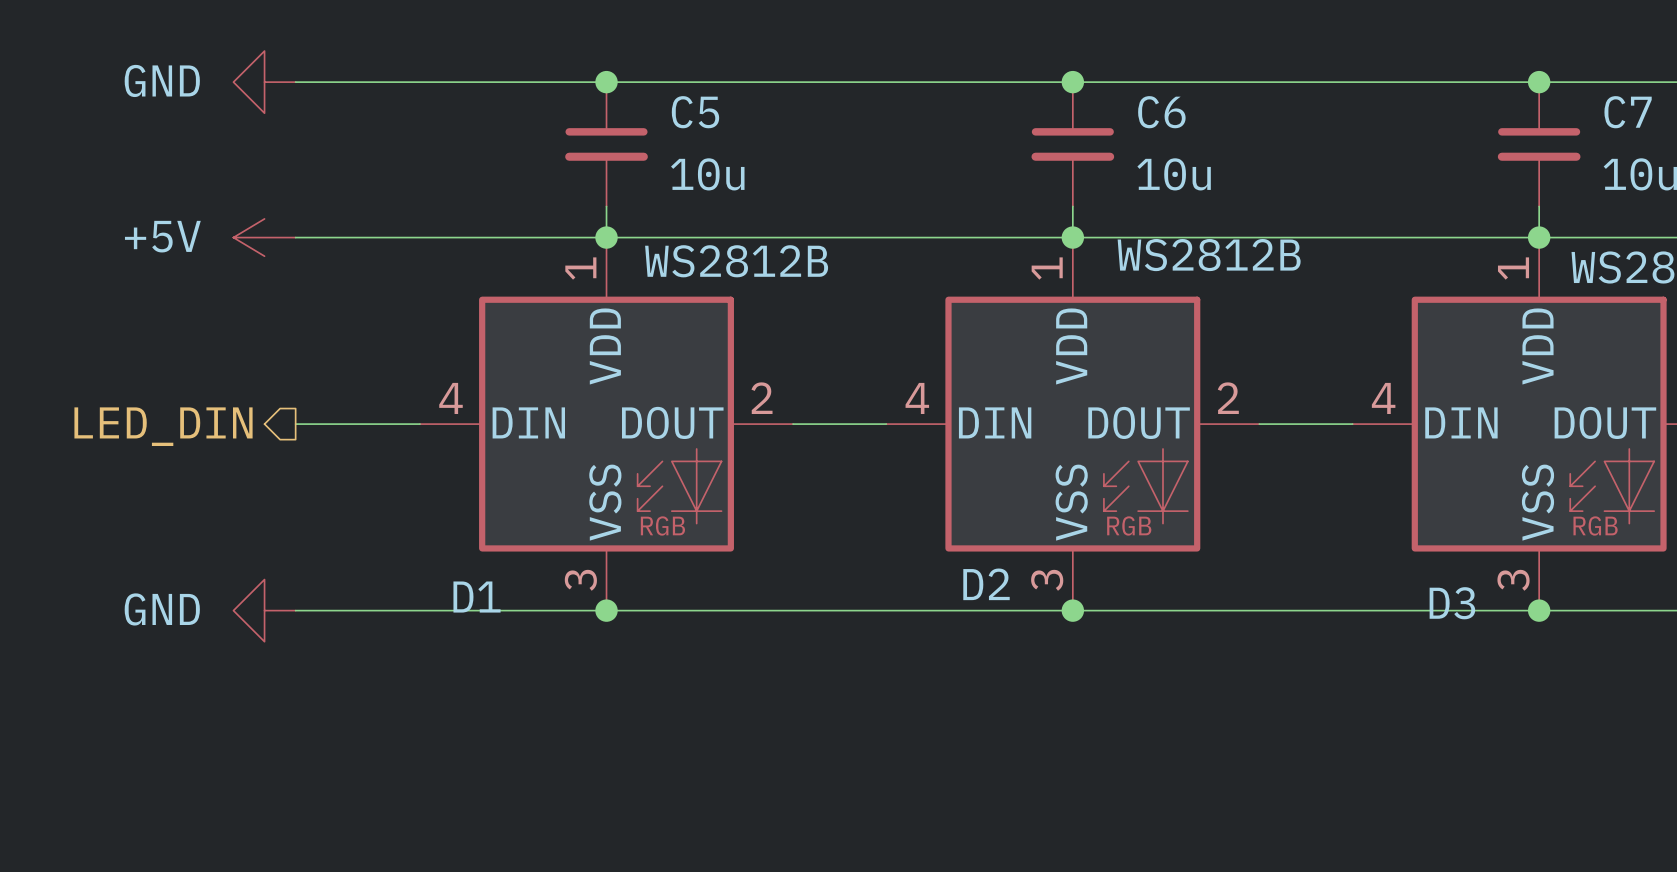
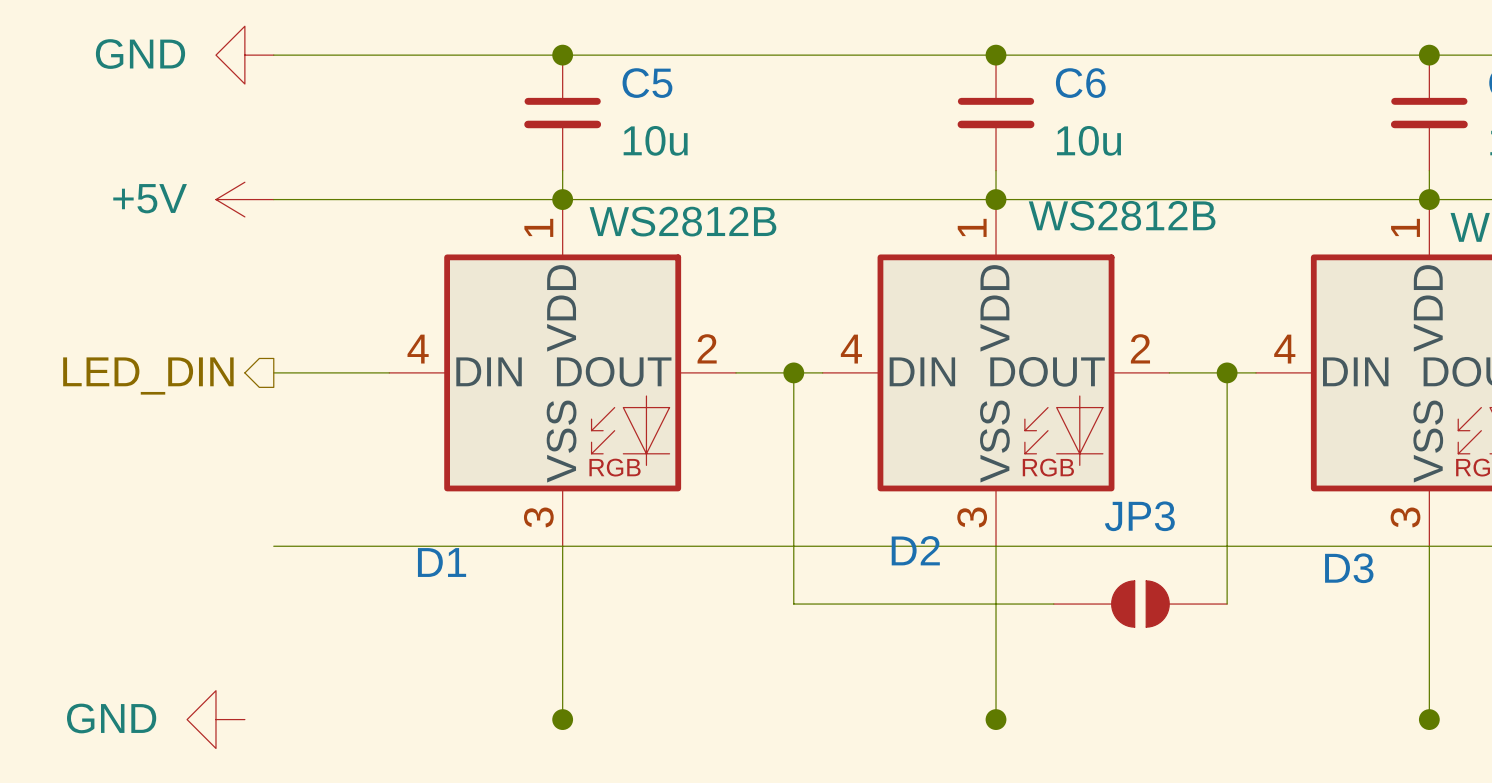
wire: none -> (793, 372) (793, 604) (1053, 604)
junction: none -> (793, 372)
wire: none -> (1227, 372) (1227, 604)
junction: none -> (1227, 372)
D2 name position: D2 (986, 584) -> D2 (915, 550)
D1 name position: D1 (477, 597) -> D1 (442, 562)
D3 name position: D3 (1452, 603) -> D3 (1349, 568)
power symbol position: GND (264, 610) -> GND (215, 719)
wire: none -> (562, 546) (562, 719)
junction: (606, 610) -> none
wire: none -> (996, 546) (996, 719)
junction: (1072, 610) -> none
wire: none -> (1429, 546) (1429, 719)
junction: (1539, 610) -> none
JP3: none -> (1140, 604)
junction: none -> (562, 719)
junction: none -> (996, 719)
junction: none -> (1429, 719)

